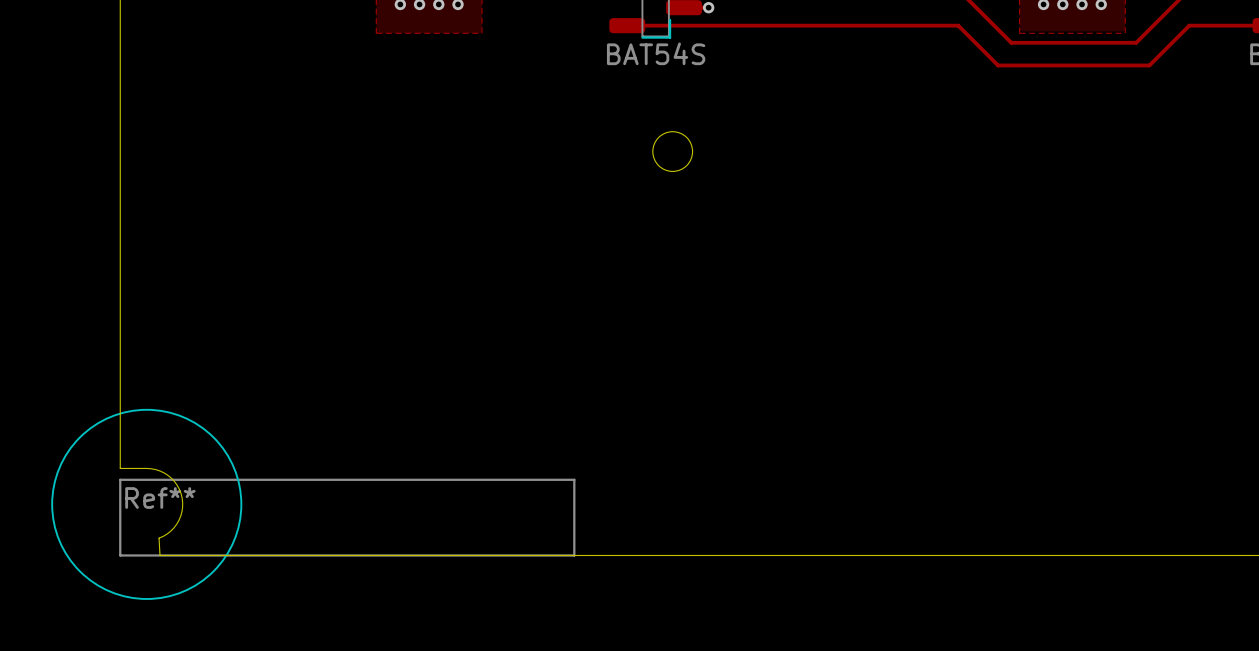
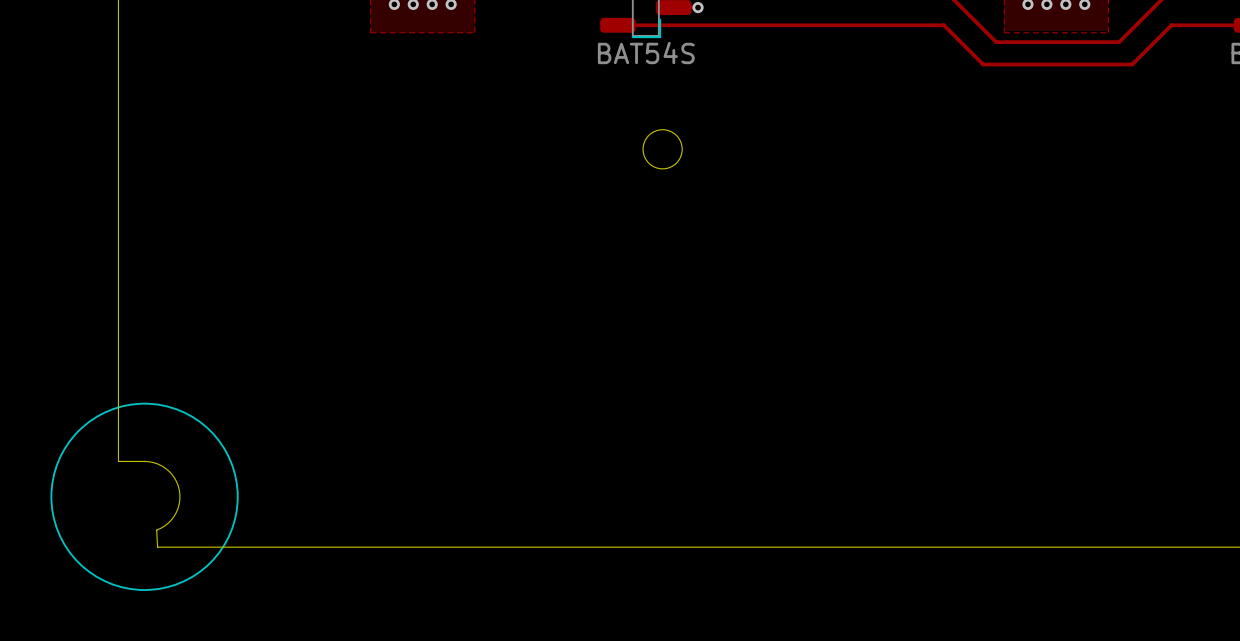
Ref**: (347, 517) -> none

